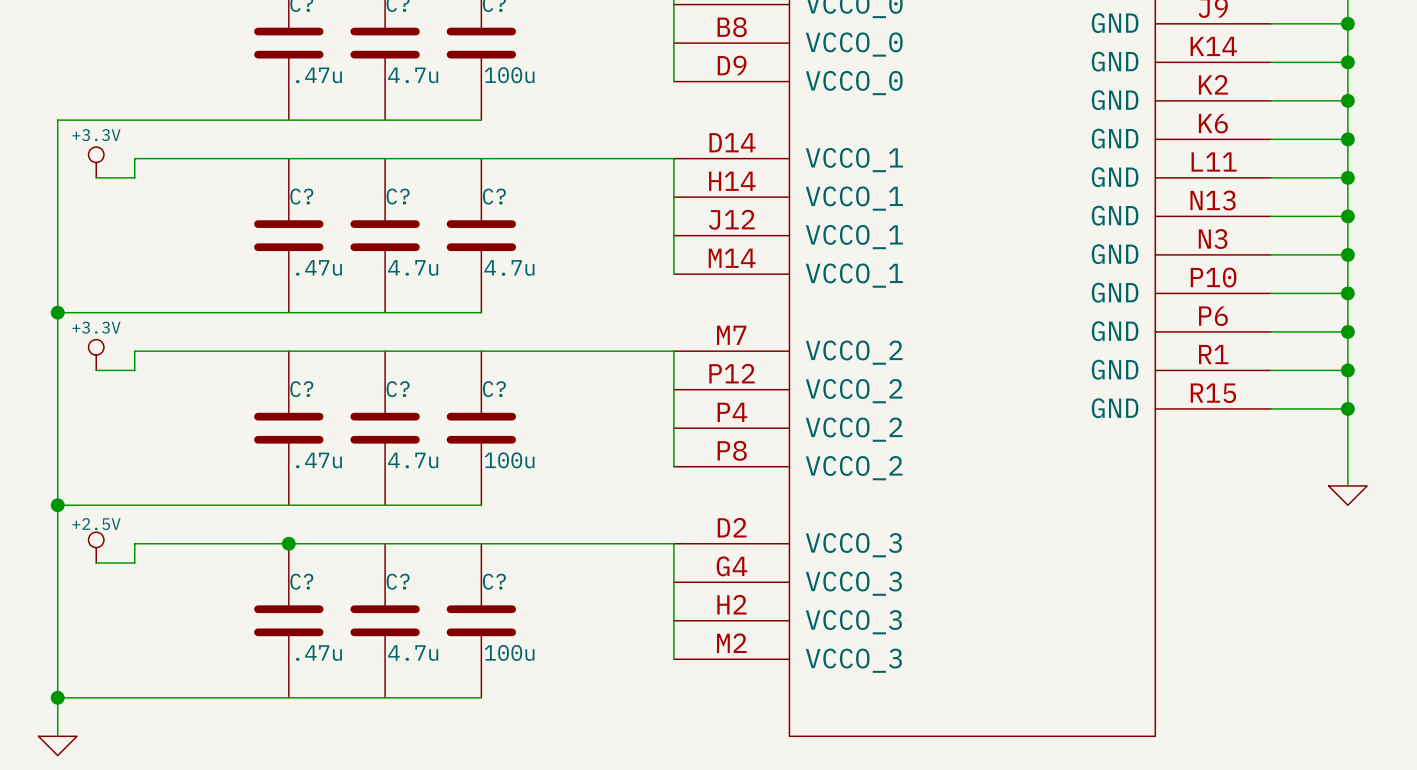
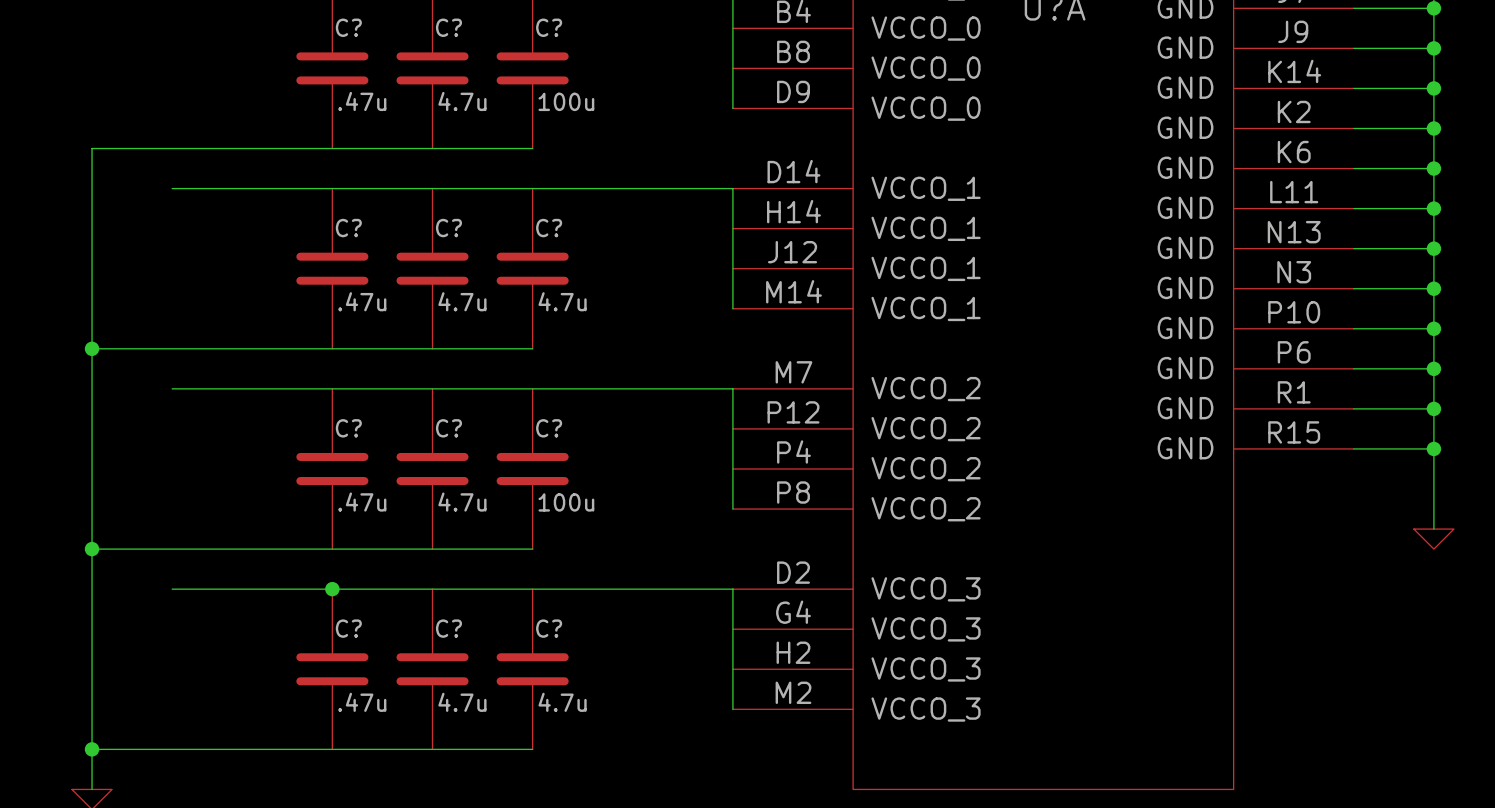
wire: (134, 158) (134, 177) (96, 177) -> none
power symbol: +3.3V (96, 162) -> none
wire: (134, 351) (134, 370) (96, 370) -> none
power symbol: +3.3V (96, 355) -> none
wire: (134, 543) (134, 563) (96, 563) -> none
power symbol: +2.5V (96, 547) -> none
C? value: 100u (509, 652) -> 4.7u (562, 702)

